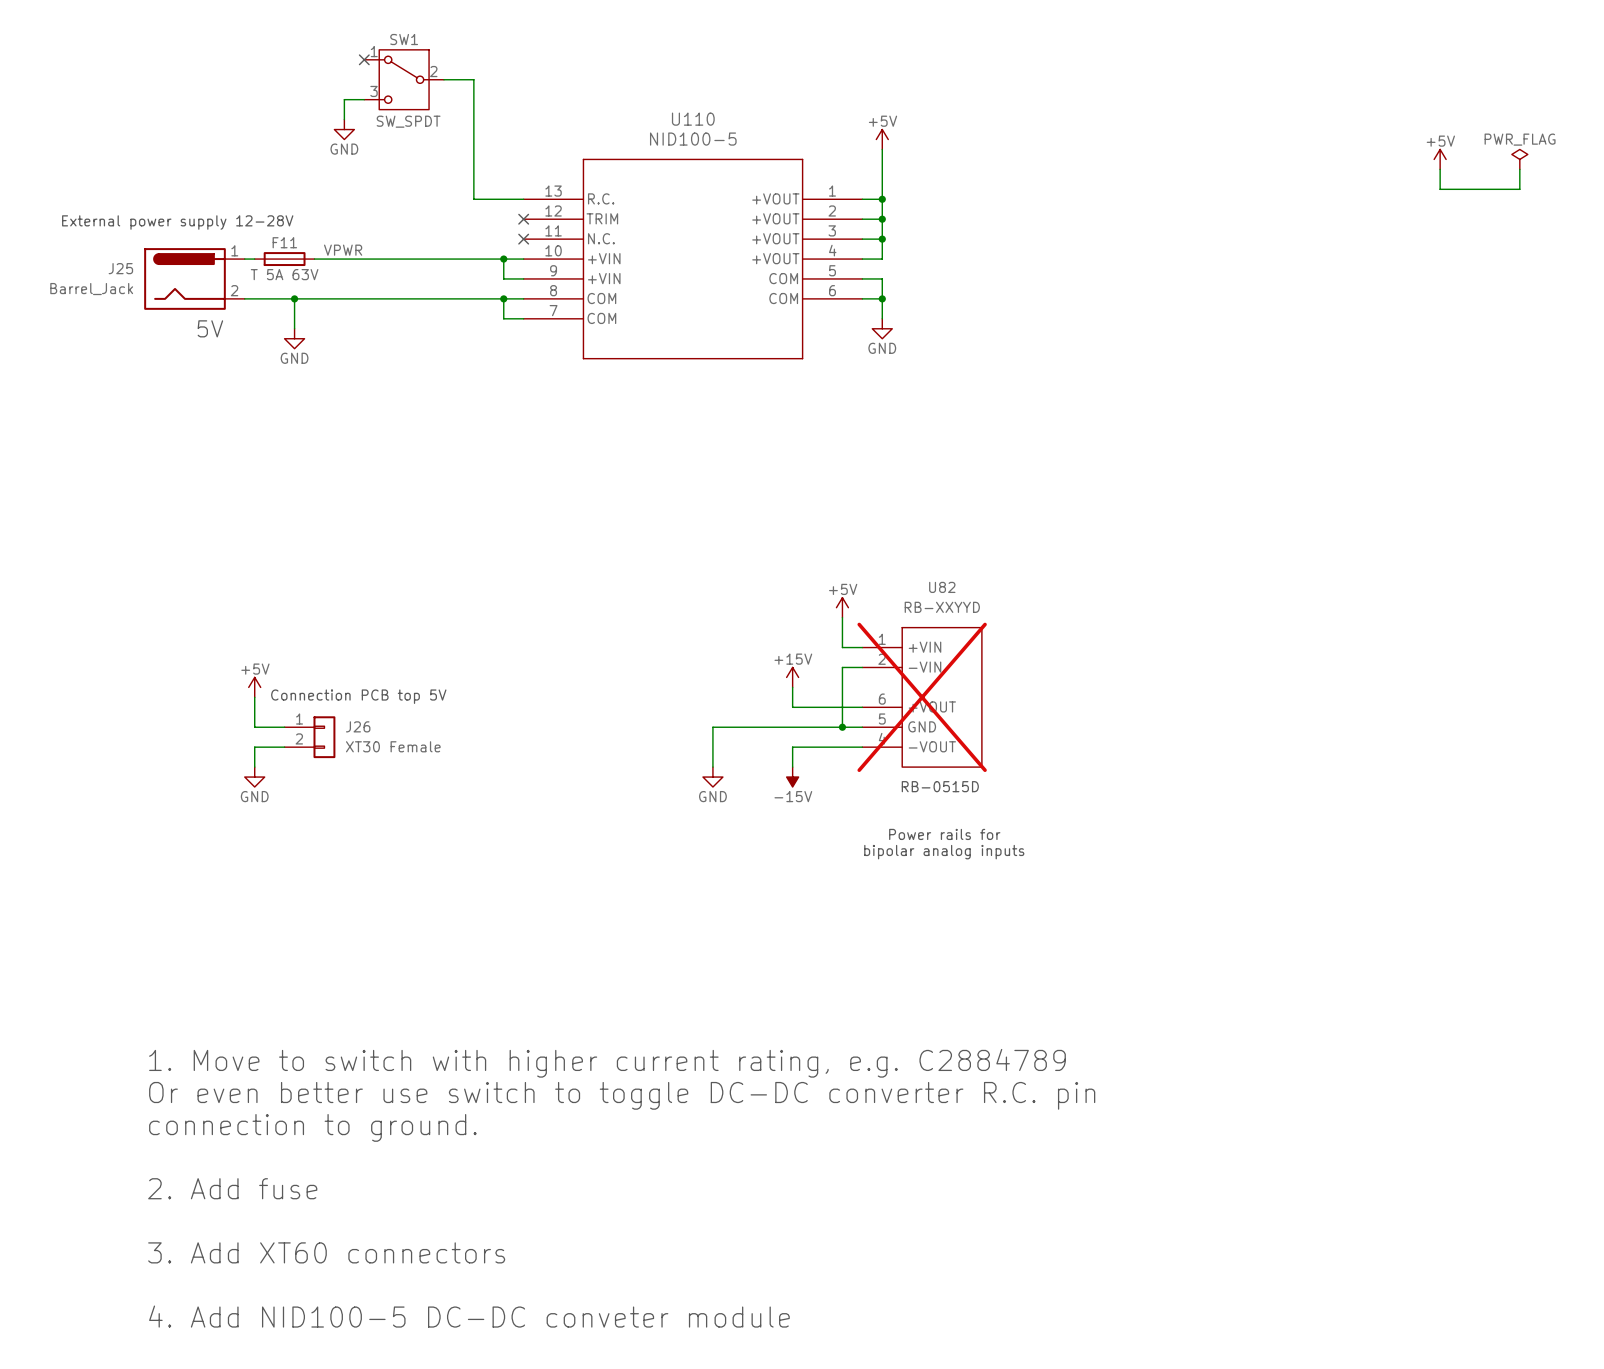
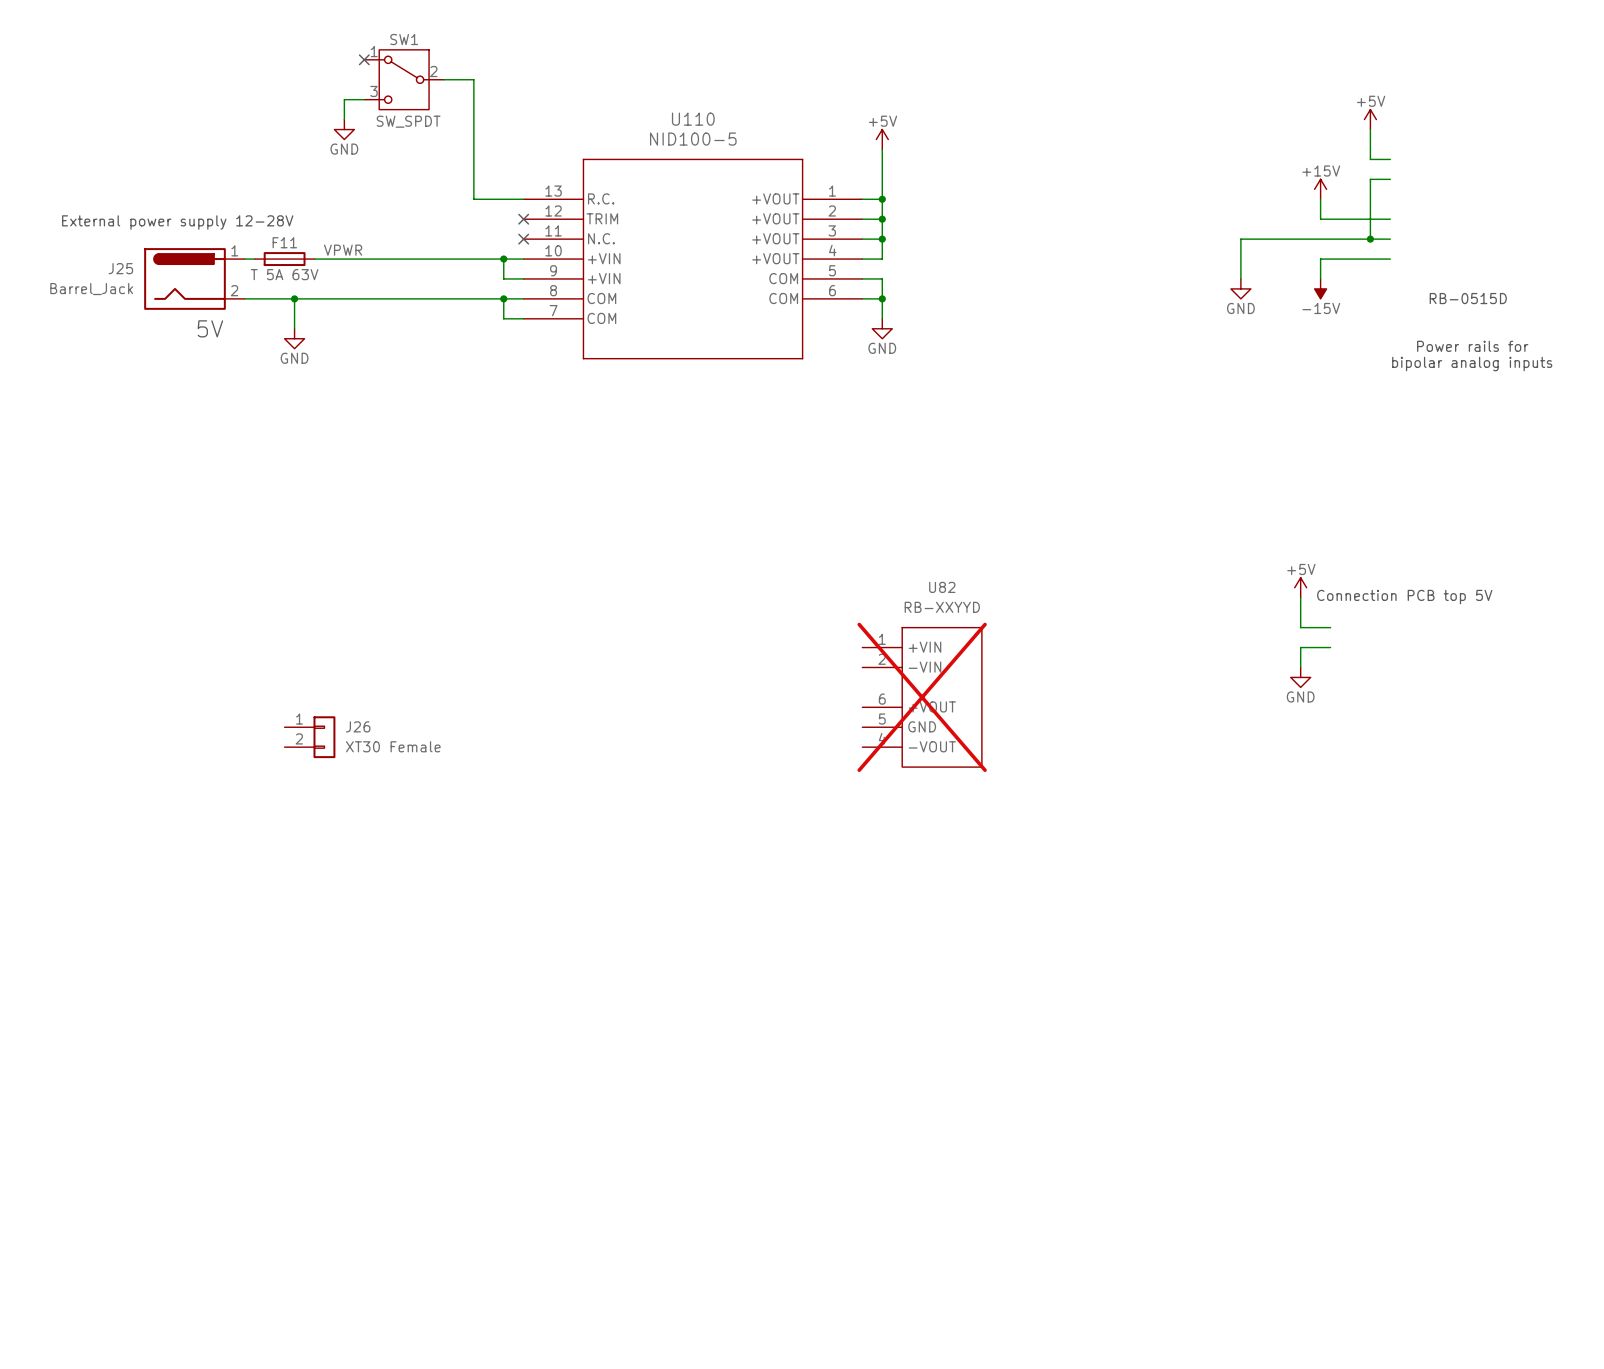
wire: none -> (1370, 129) (1370, 159) (1390, 159)
power symbol position: +5V (1440, 159) -> +5V (1370, 119)
power symbol: PWR_FLAG (1519, 159) -> none
wire: (1440, 169) (1440, 189) (1519, 189) (1519, 169) -> none
wire: none -> (1390, 179) (1370, 179) (1370, 239)
power symbol: none -> +15V (1320, 189)
wire: none -> (1320, 199) (1320, 219) (1390, 219)
junction: none -> (1370, 239)
wire: none -> (1390, 239) (1240, 239) (1240, 278)
wire: none -> (1390, 259) (1320, 259) (1320, 278)
power symbol: none -> GND (1240, 288)
power symbol: none -> -15V (1320, 288)
text: none -> RB-0515D (1468, 298)
text: none -> Power rails for (1472, 346)
text: none -> bipolar analog inputs (1472, 364)
power symbol: none -> +5V (1300, 587)
wire: none -> (1300, 597) (1300, 627) (1330, 627)
text: none -> Connection PCB top 5V (1404, 597)
power symbol: +5V (842, 607) -> none
wire: (842, 617) (842, 647) (862, 647) -> none
wire: none -> (1330, 647) (1300, 647) (1300, 667)
wire: (862, 667) (842, 667) (842, 727) -> none
power symbol: +15V (792, 677) -> none
power symbol: none -> GND (1300, 677)
power symbol: +5V (254, 687) -> none
wire: (792, 687) (792, 707) (862, 707) -> none
text: Connection PCB top 5V (358, 696) -> none
wire: (254, 697) (254, 727) (284, 727) -> none
junction: (842, 727) -> none
wire: (862, 727) (712, 727) (712, 767) -> none
wire: (284, 747) (254, 747) (254, 767) -> none
wire: (862, 747) (792, 747) (792, 767) -> none
power symbol: GND (254, 777) -> none
power symbol: GND (712, 777) -> none
power symbol: -15V (792, 777) -> none
text: RB-0515D (940, 786) -> none
text: Power rails for (944, 834) -> none
text: bipolar analog inputs (944, 852) -> none
text: 1. Move to switch with higher current rating, e.g. C2884789 (607, 1063) -> none
text: Or even better use switch to toggle DC-DC converter R.C. pin (622, 1095) -> none
text: connection to ground. (312, 1127) -> none
text: 2. Add fuse (232, 1188) -> none
text: 3. Add XT60 connectors (326, 1252) -> none
text: 4. Add NID100-5 DC-DC conveter module (469, 1316) -> none

